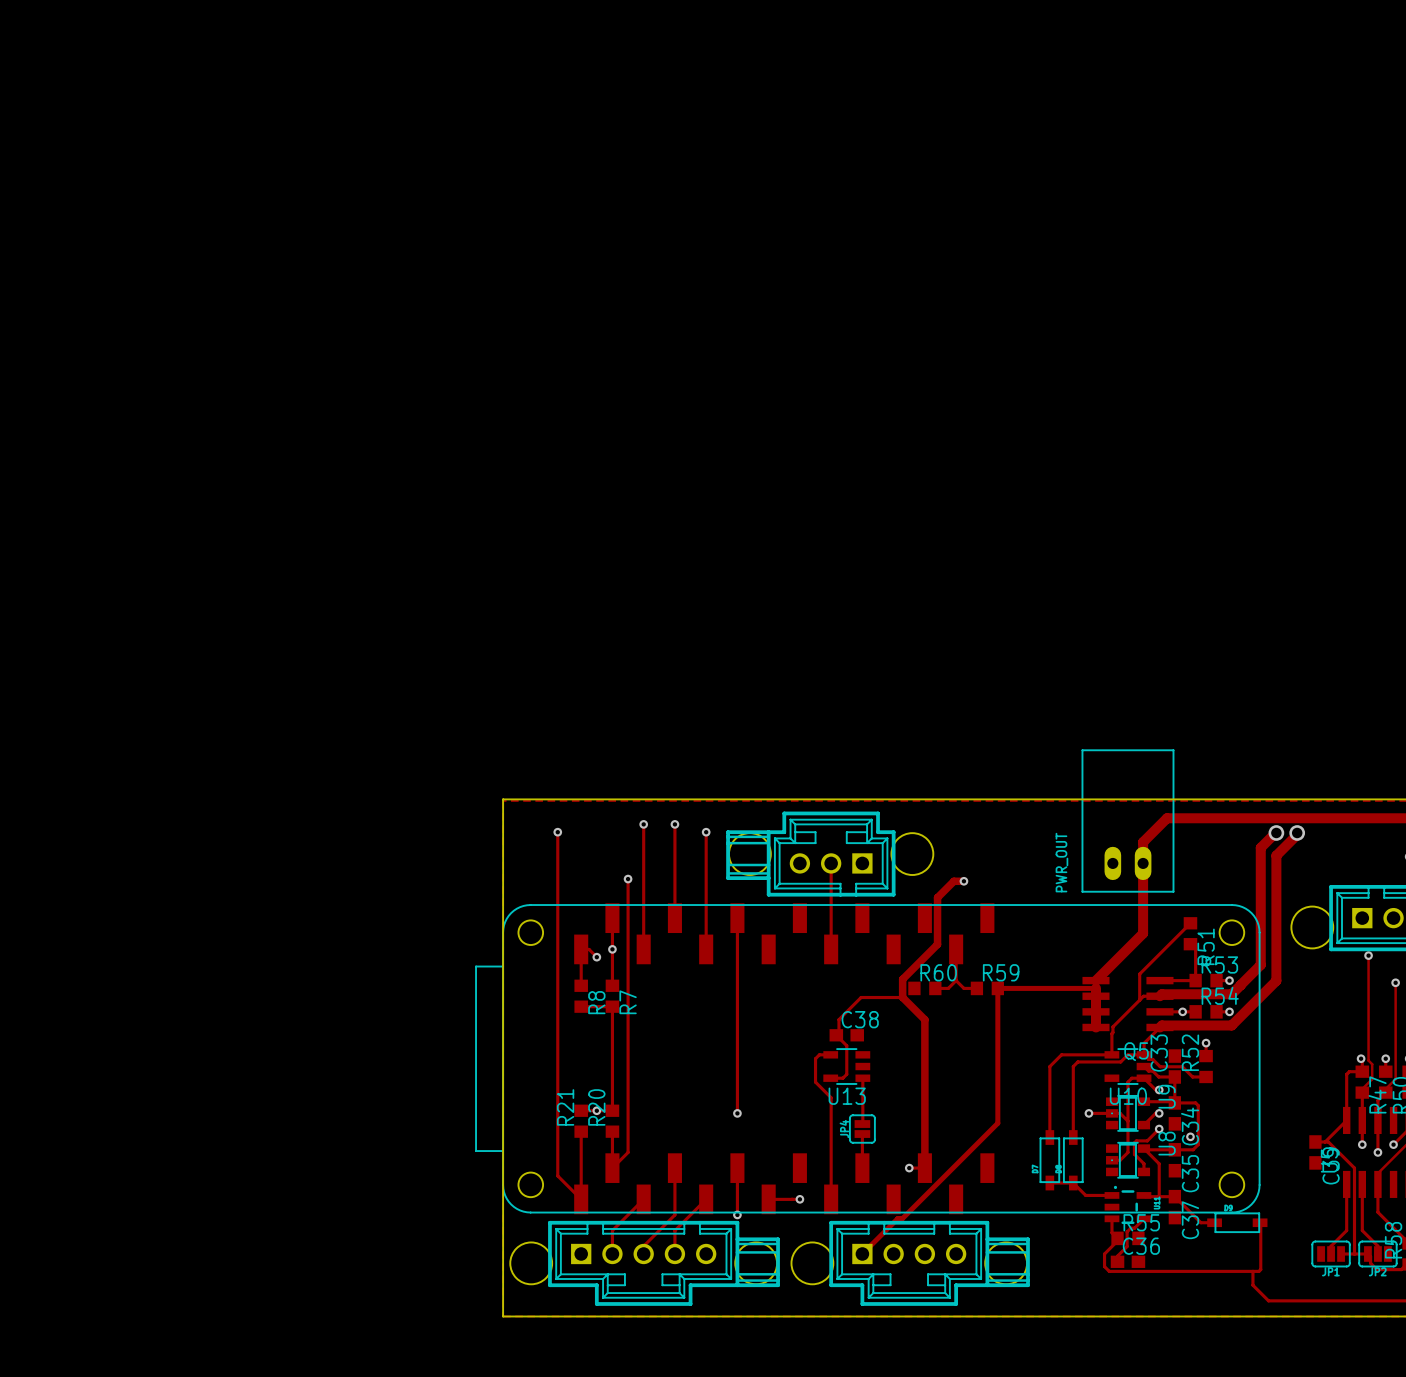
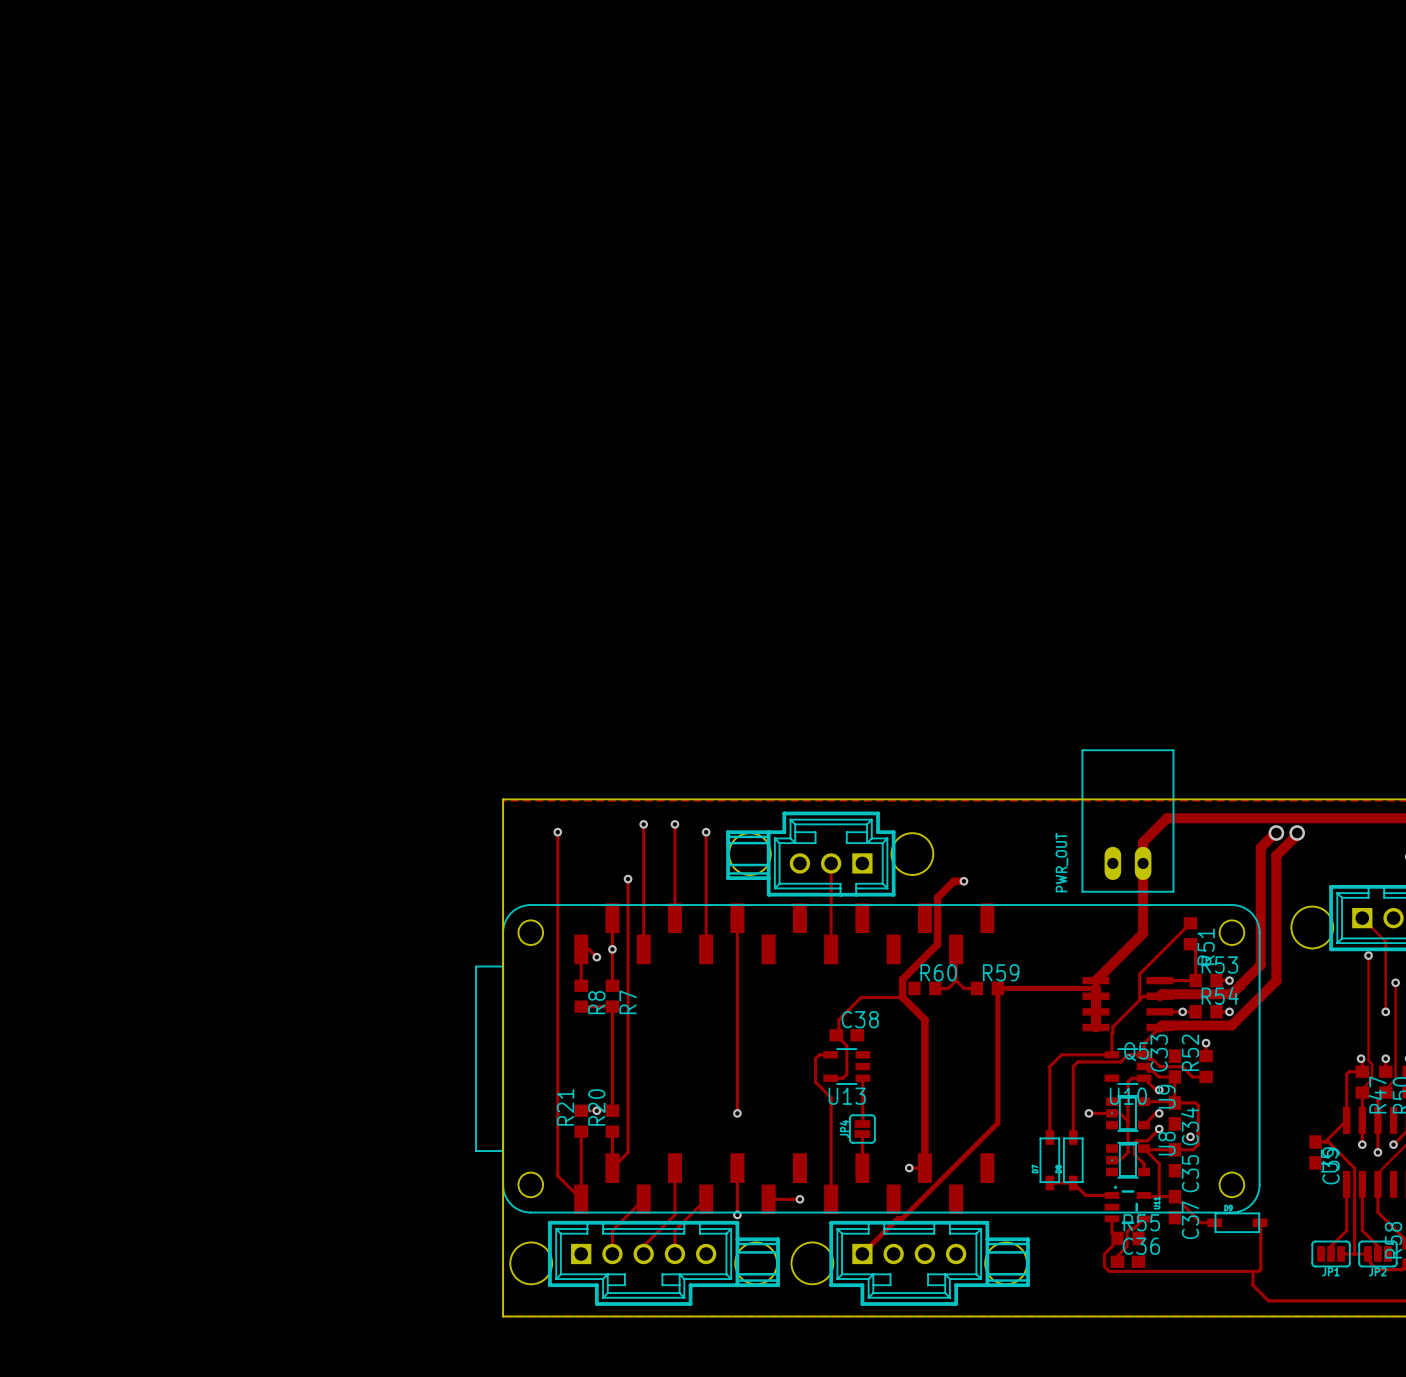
track: none -> (1362, 918) (1385, 941) (1385, 1011)
via: none -> (1385, 1011)

